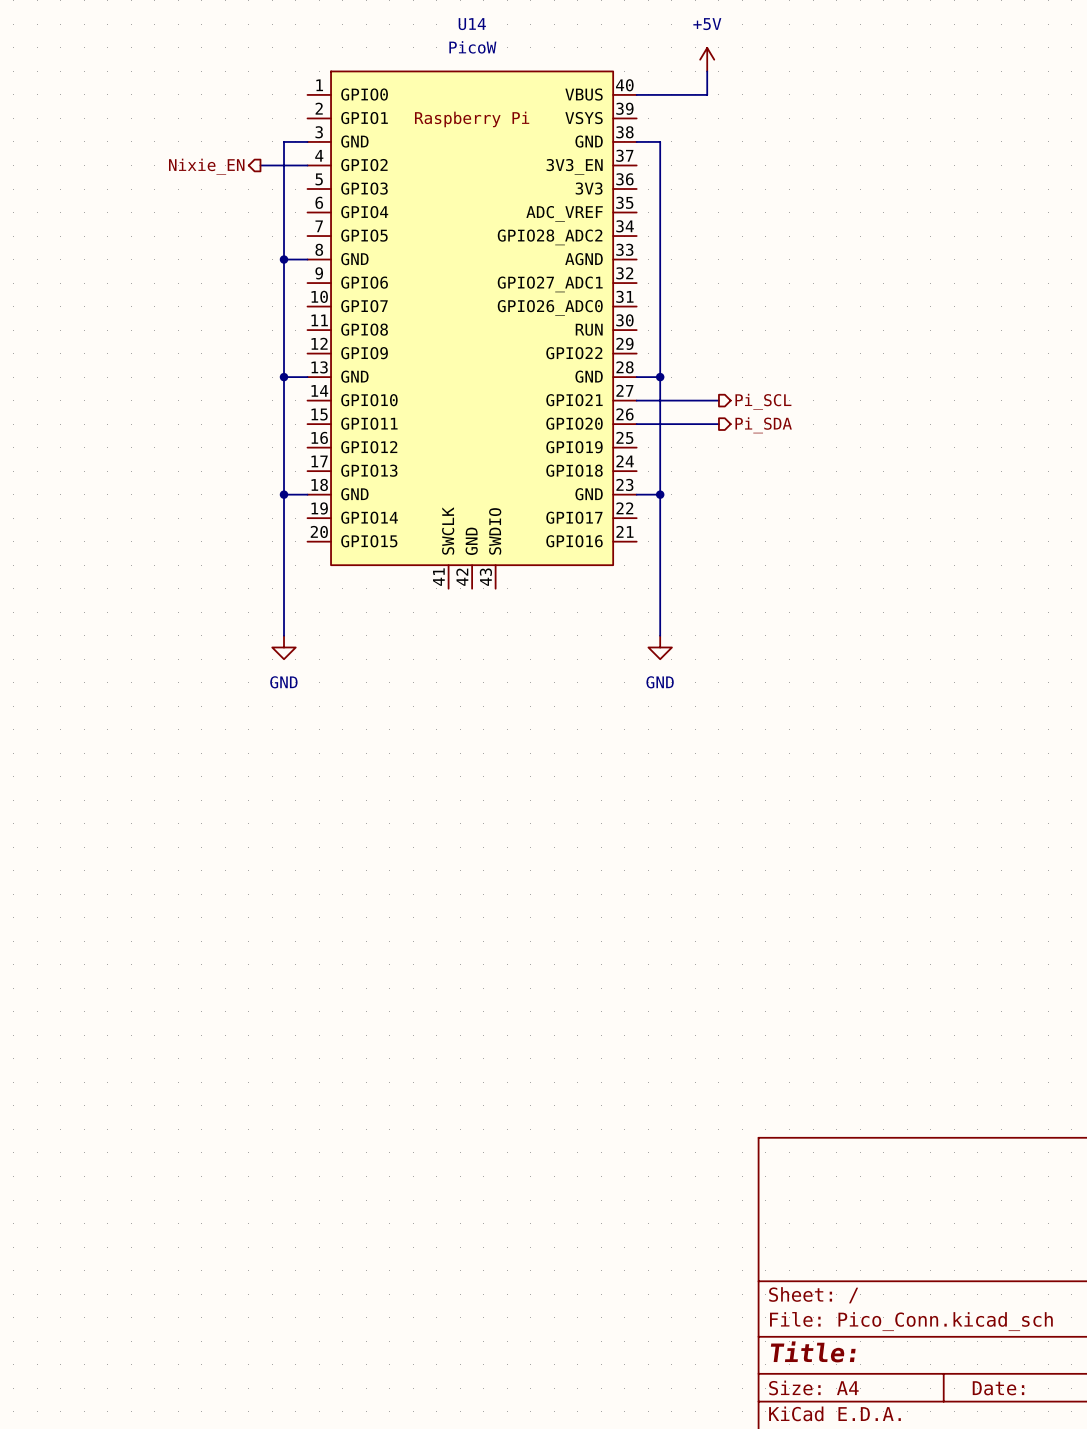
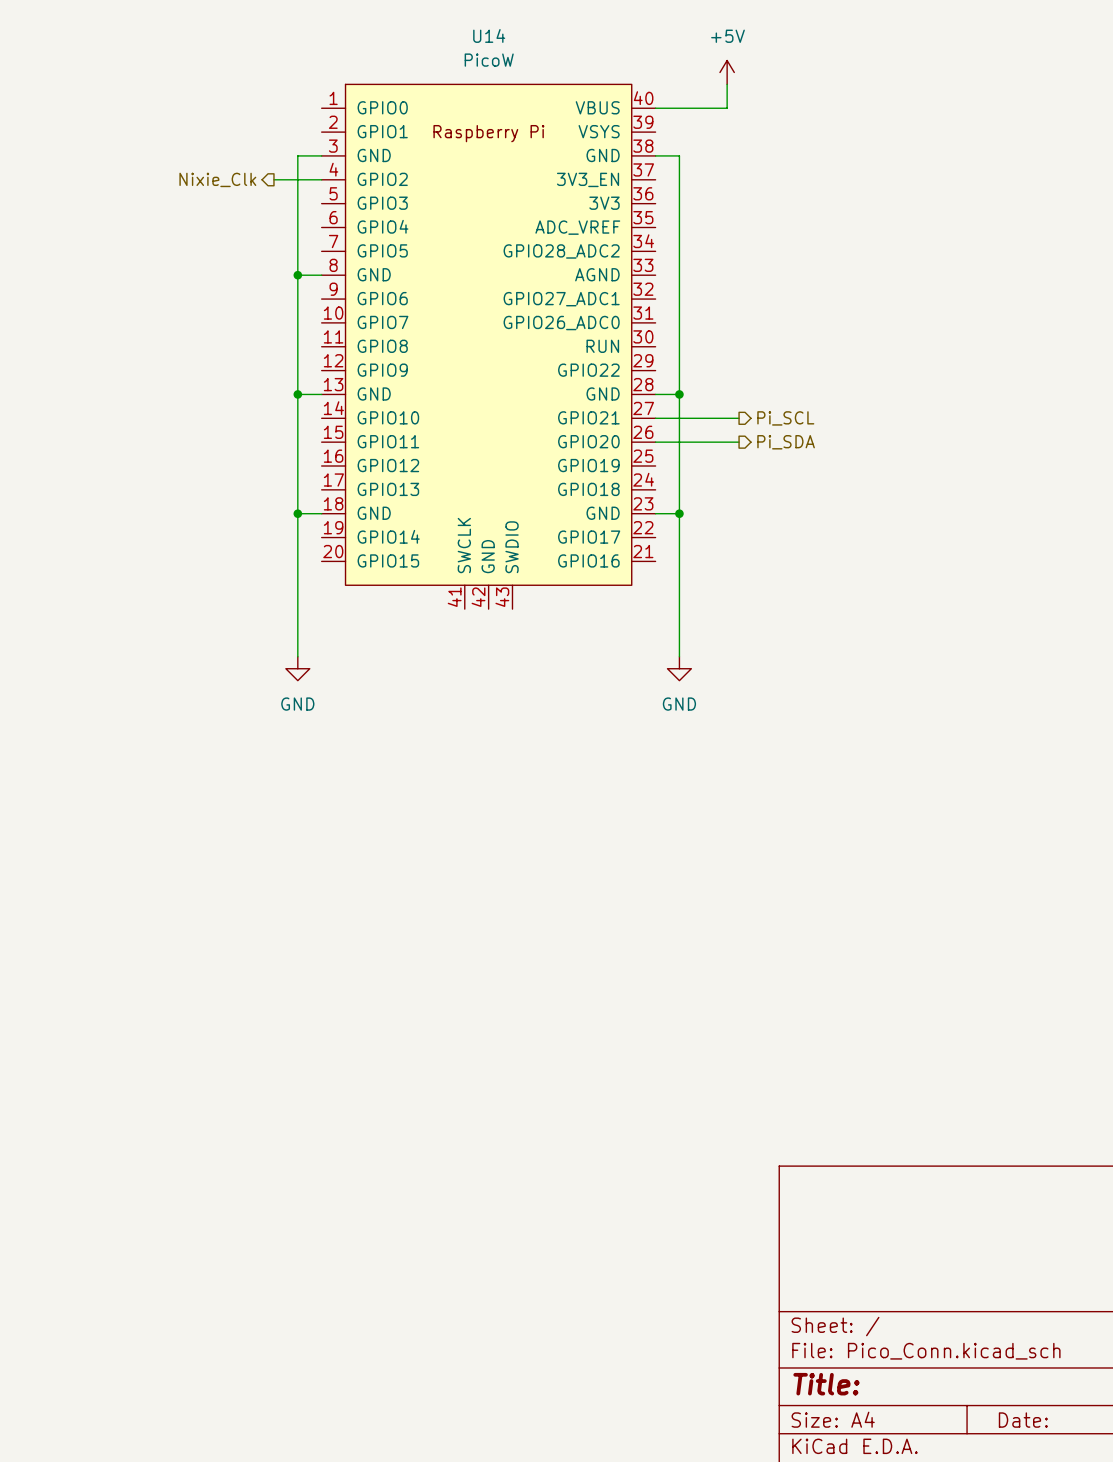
hierarchical label: Nixie_EN (206, 166) -> Nixie_Clk (217, 179)

